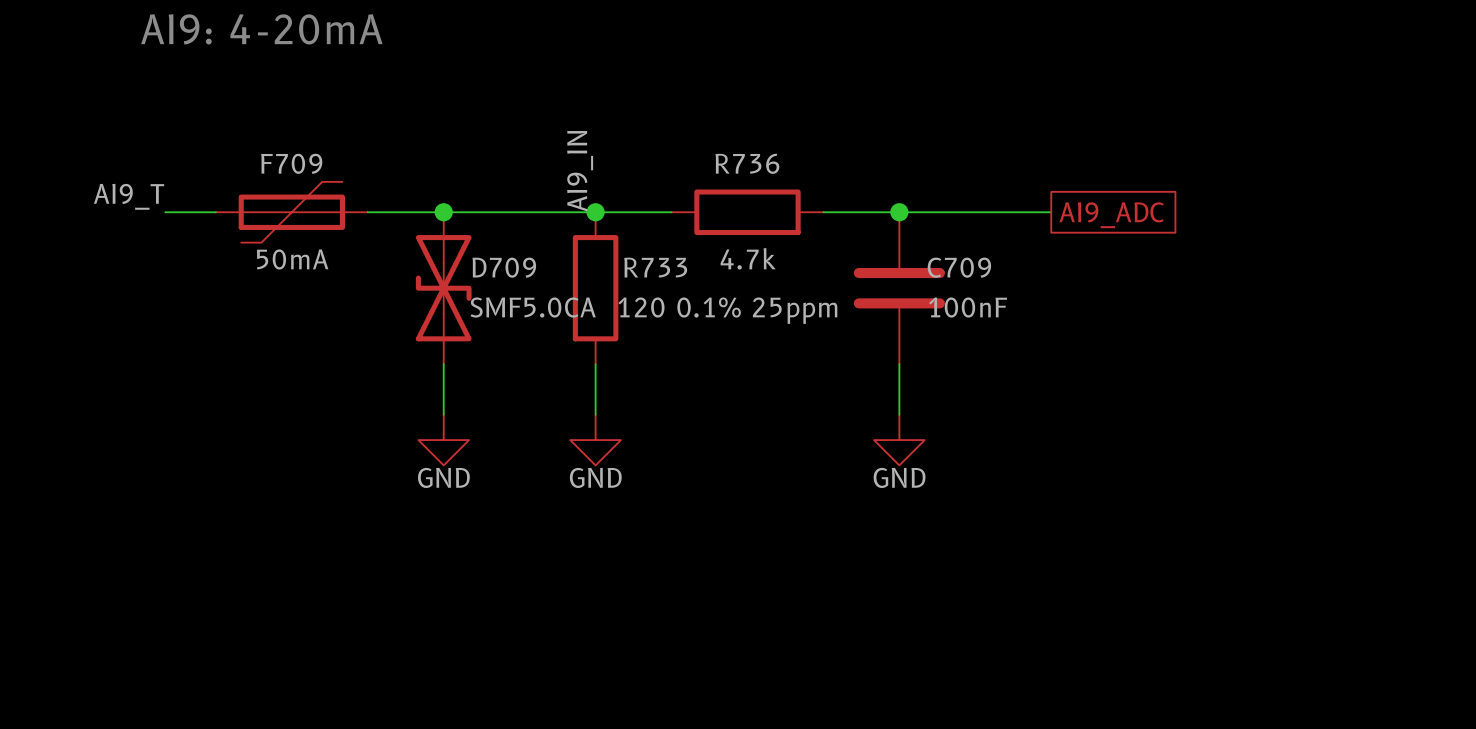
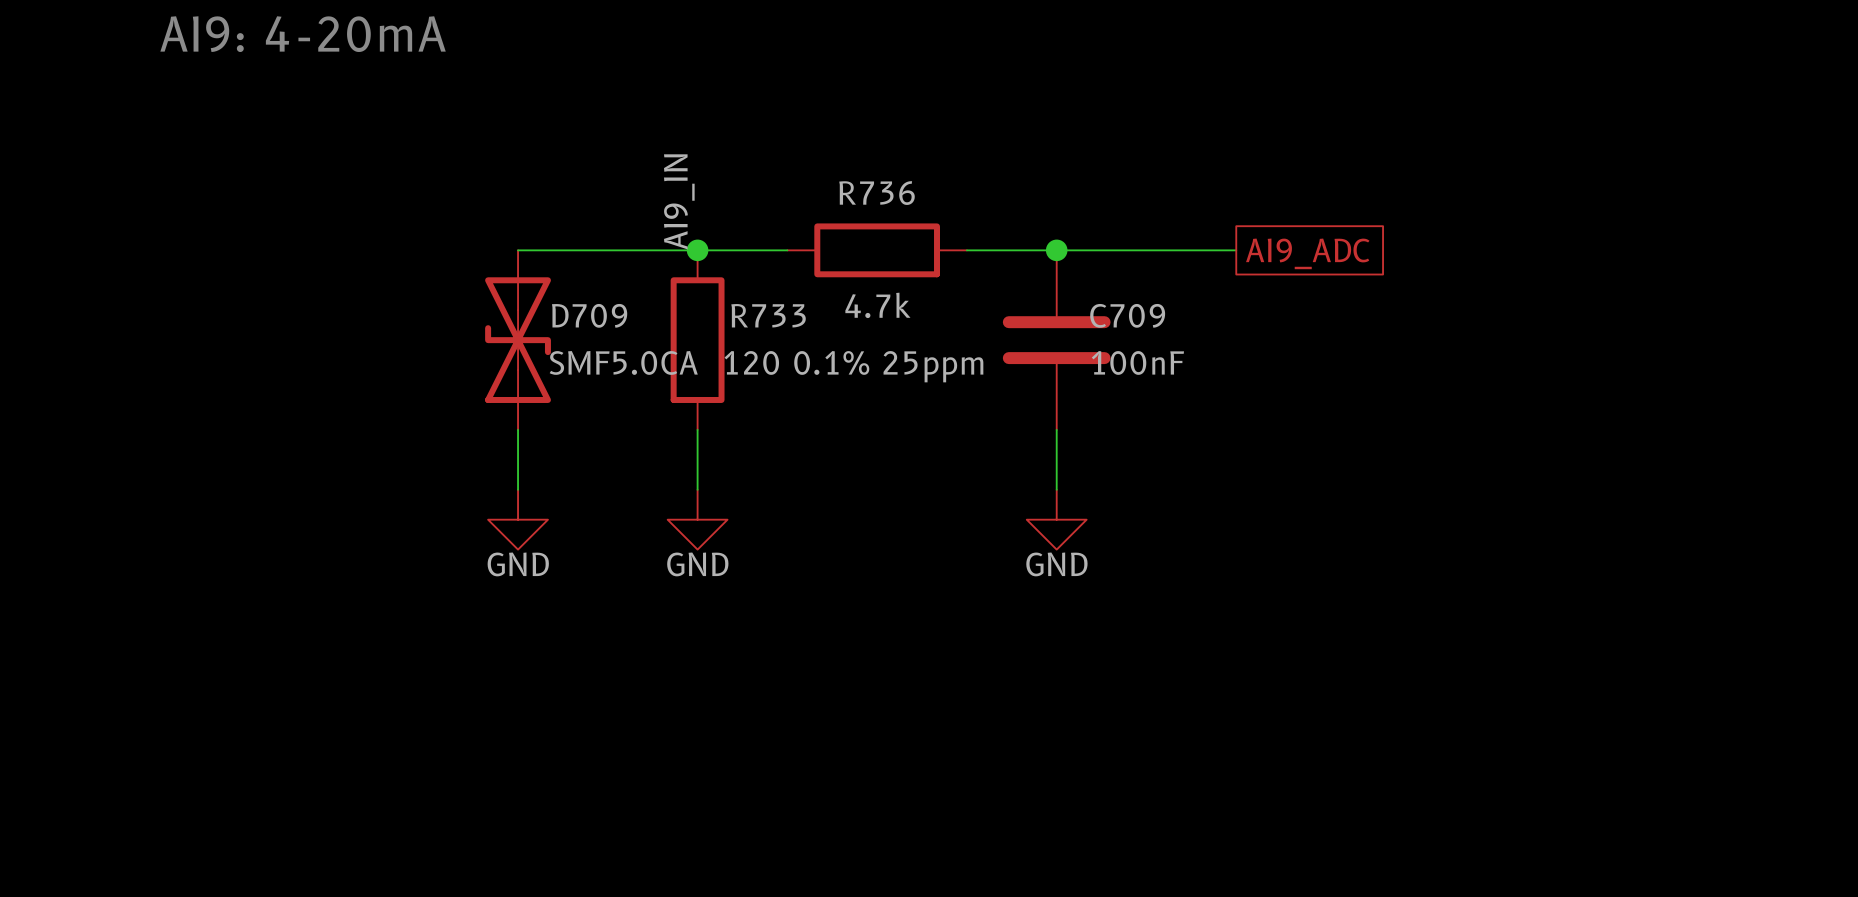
label: AI9_T (129, 196) -> none
wire: (165, 212) (215, 212) -> none
F709: 50mA (291, 212) -> none
wire: (367, 212) (443, 212) -> none
junction: (443, 212) -> none

